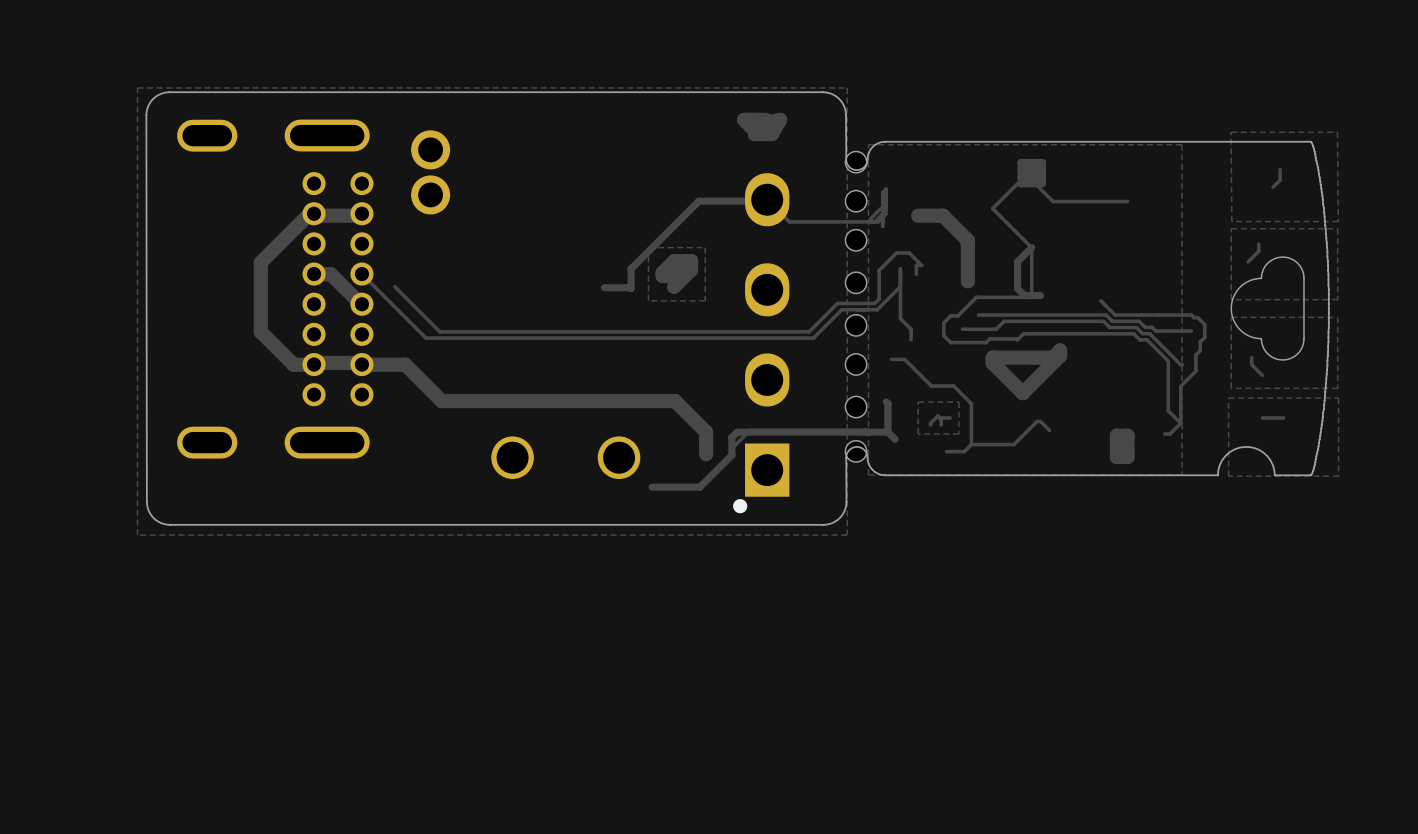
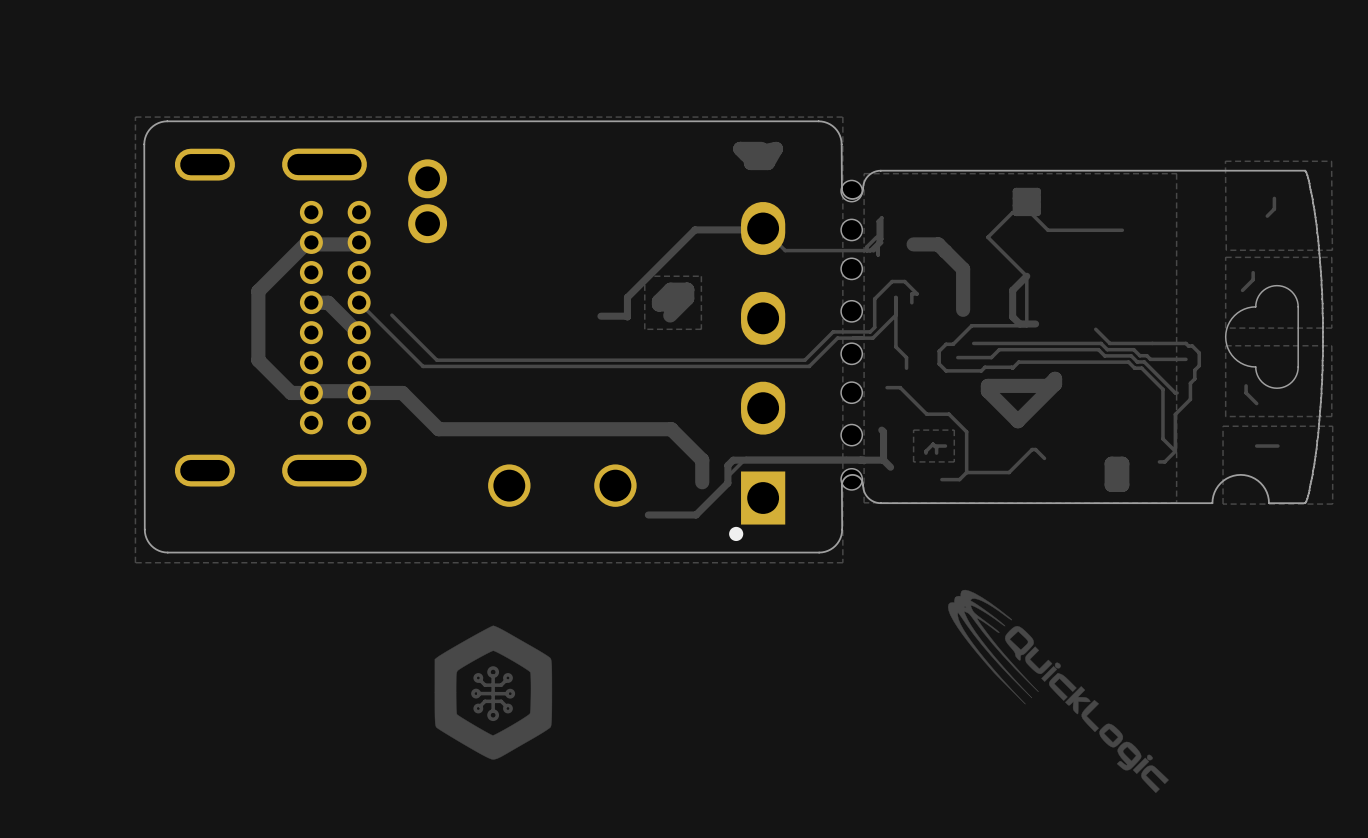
drawing: none -> [947, 589, 1169, 793]
drawing: none -> [434, 625, 553, 760]

